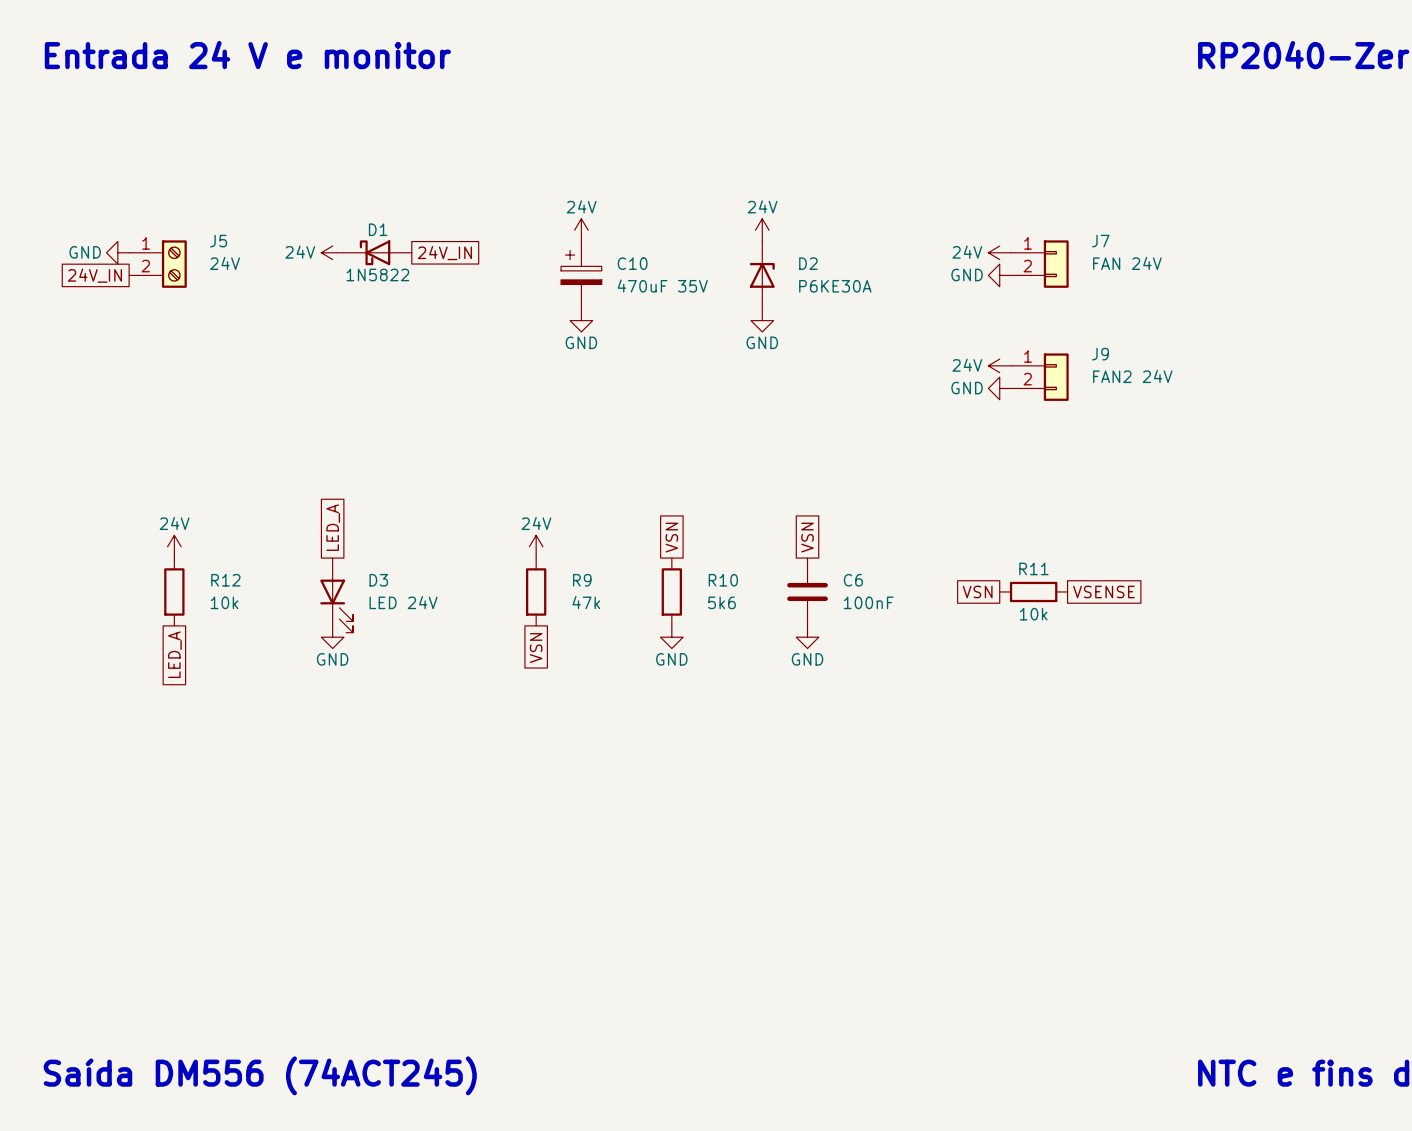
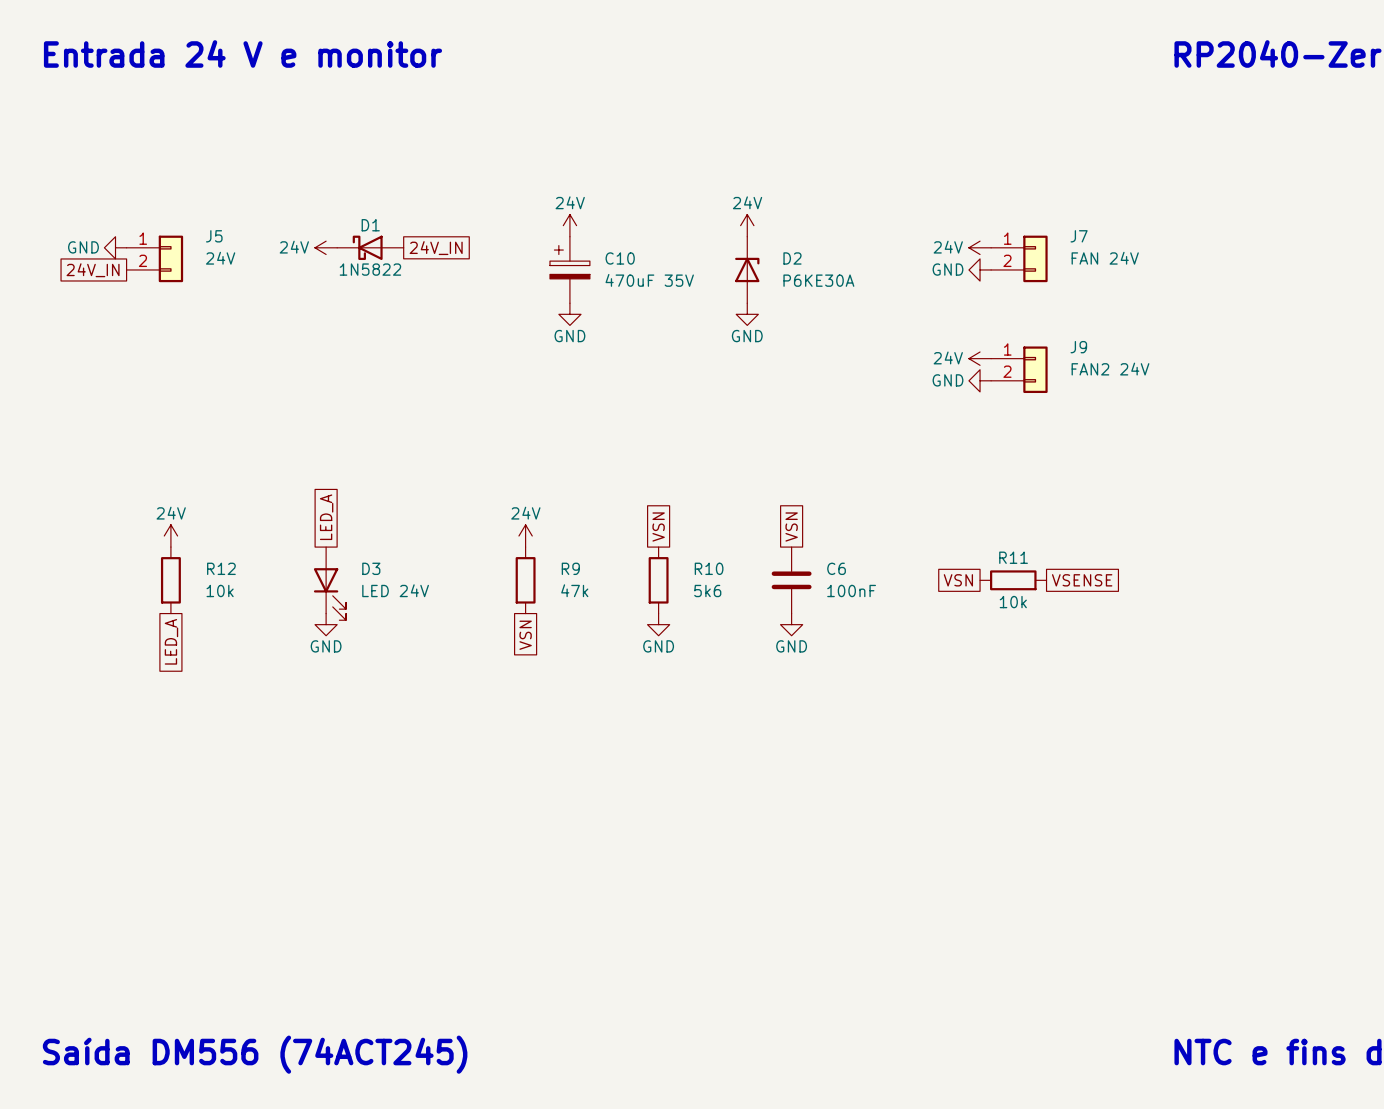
J5 symbol: [129, 240, 187, 288] -> [126, 235, 184, 283]

